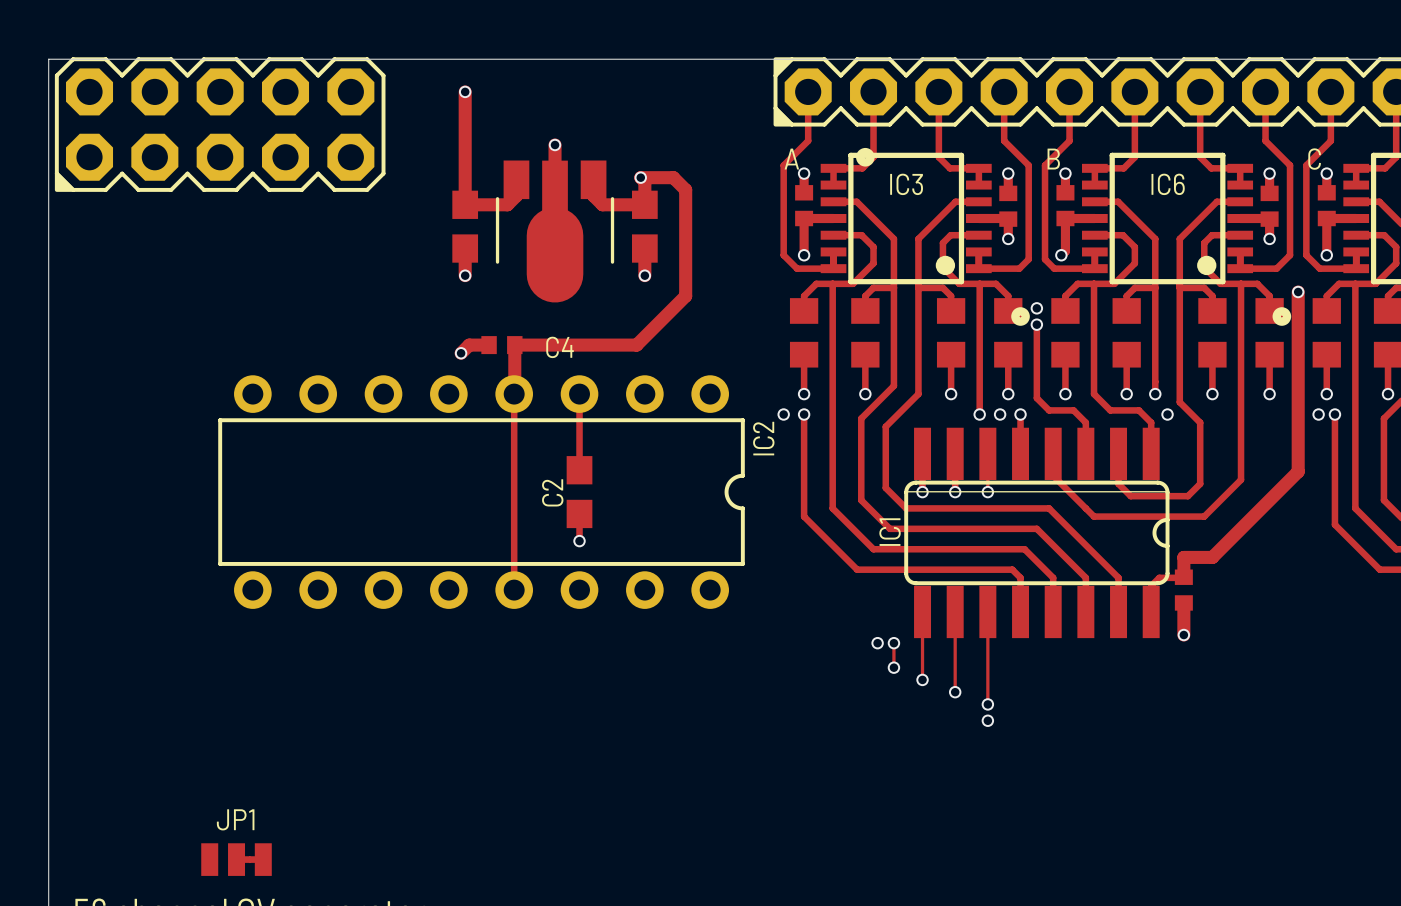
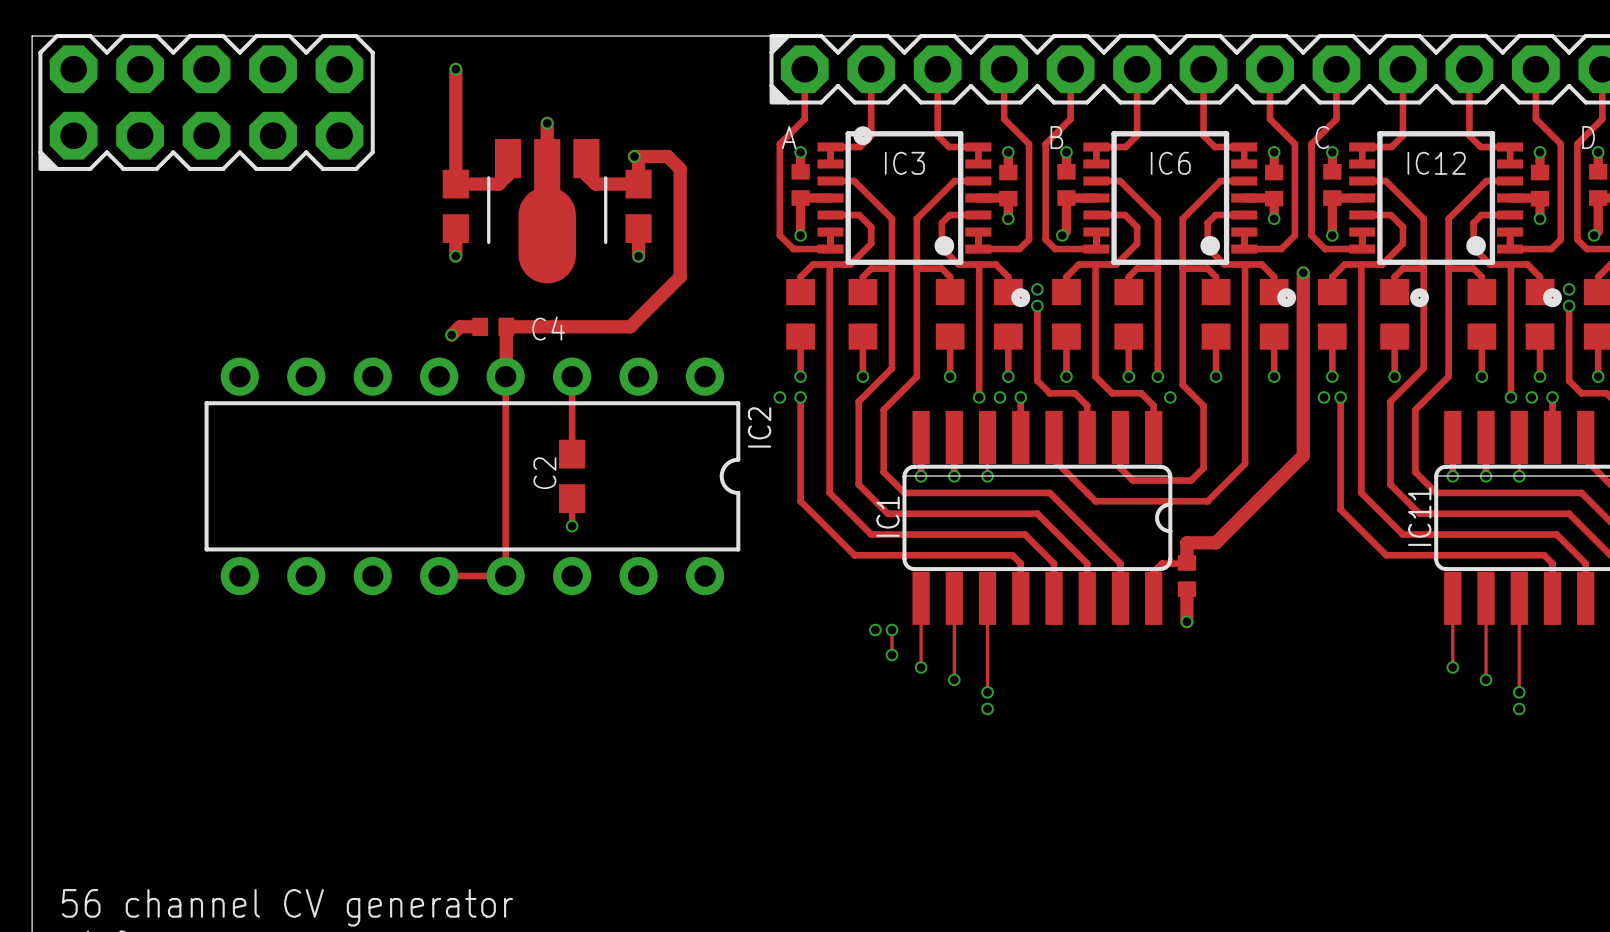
track: none -> (439, 576) (505, 576)
JP1: (236, 859) -> none

